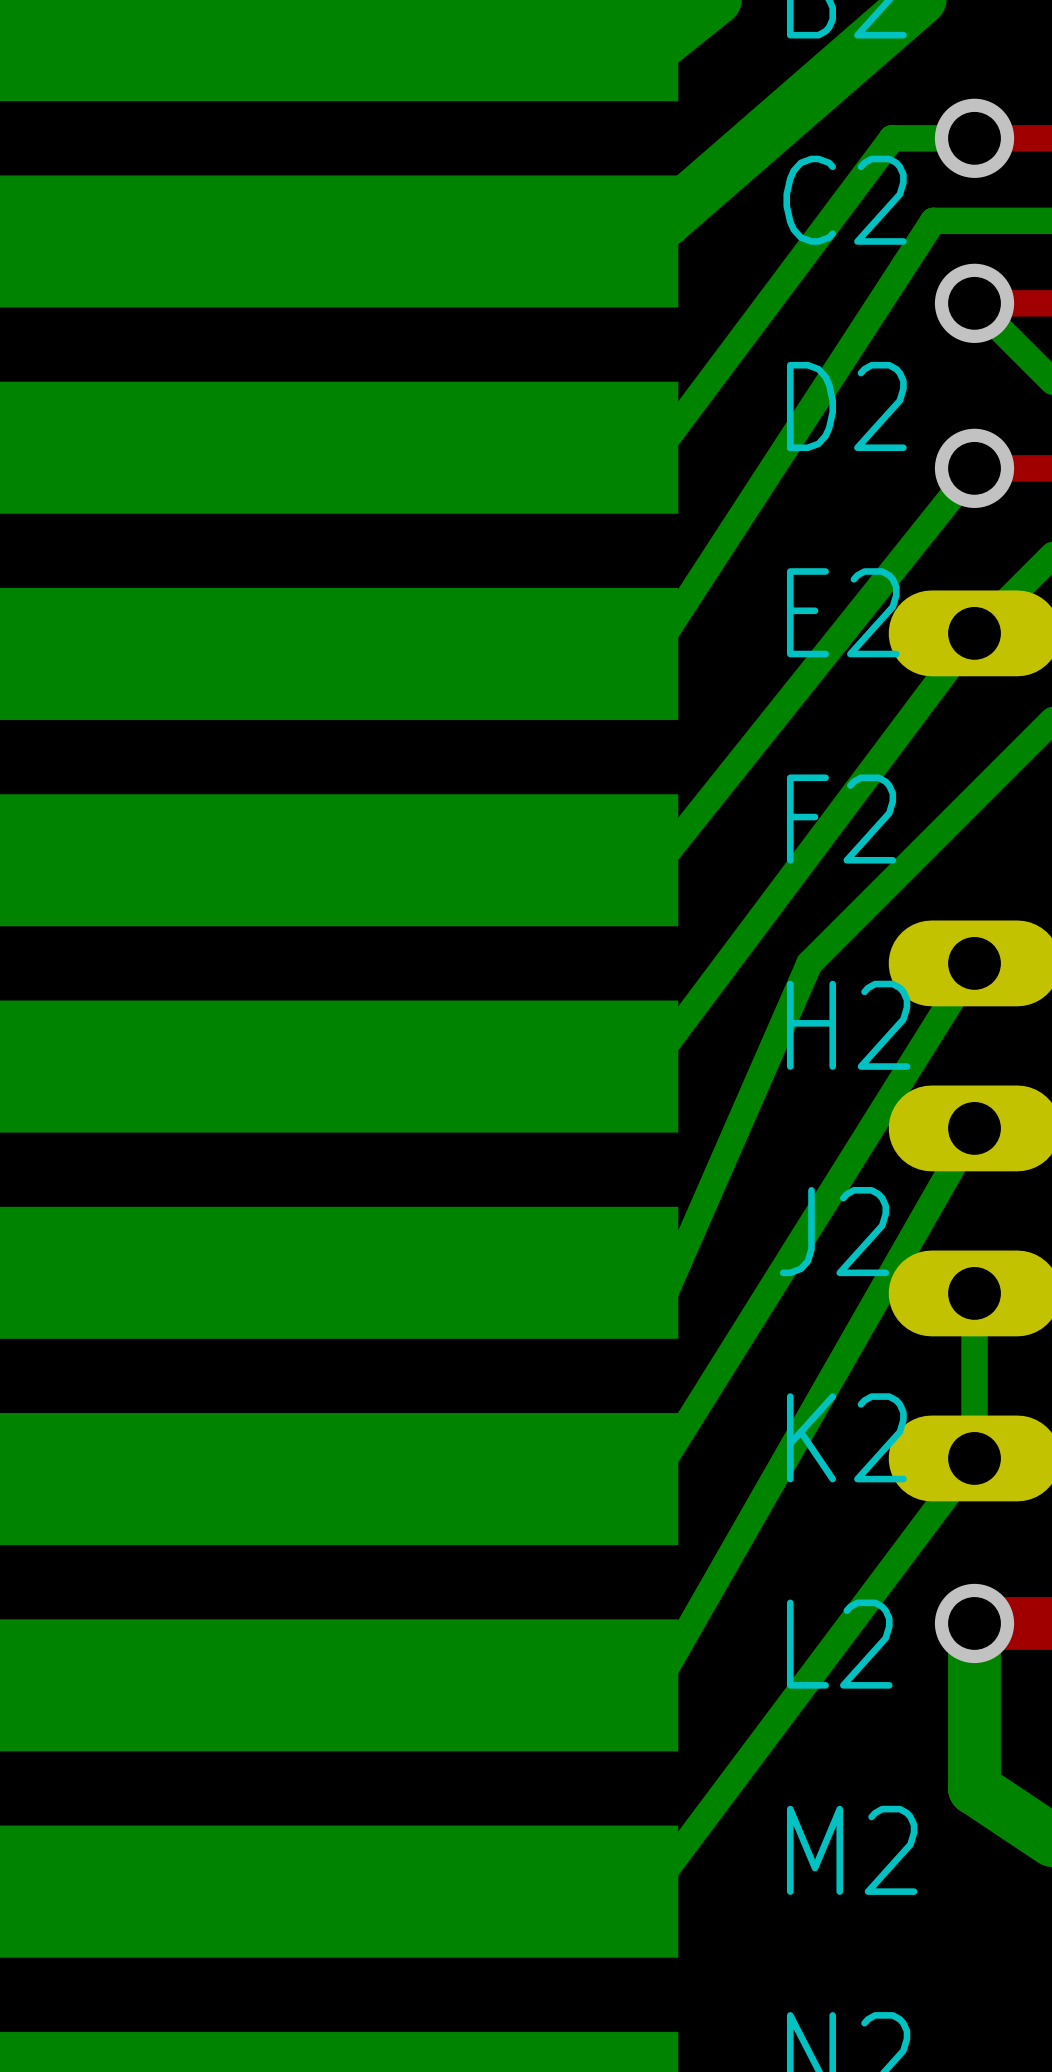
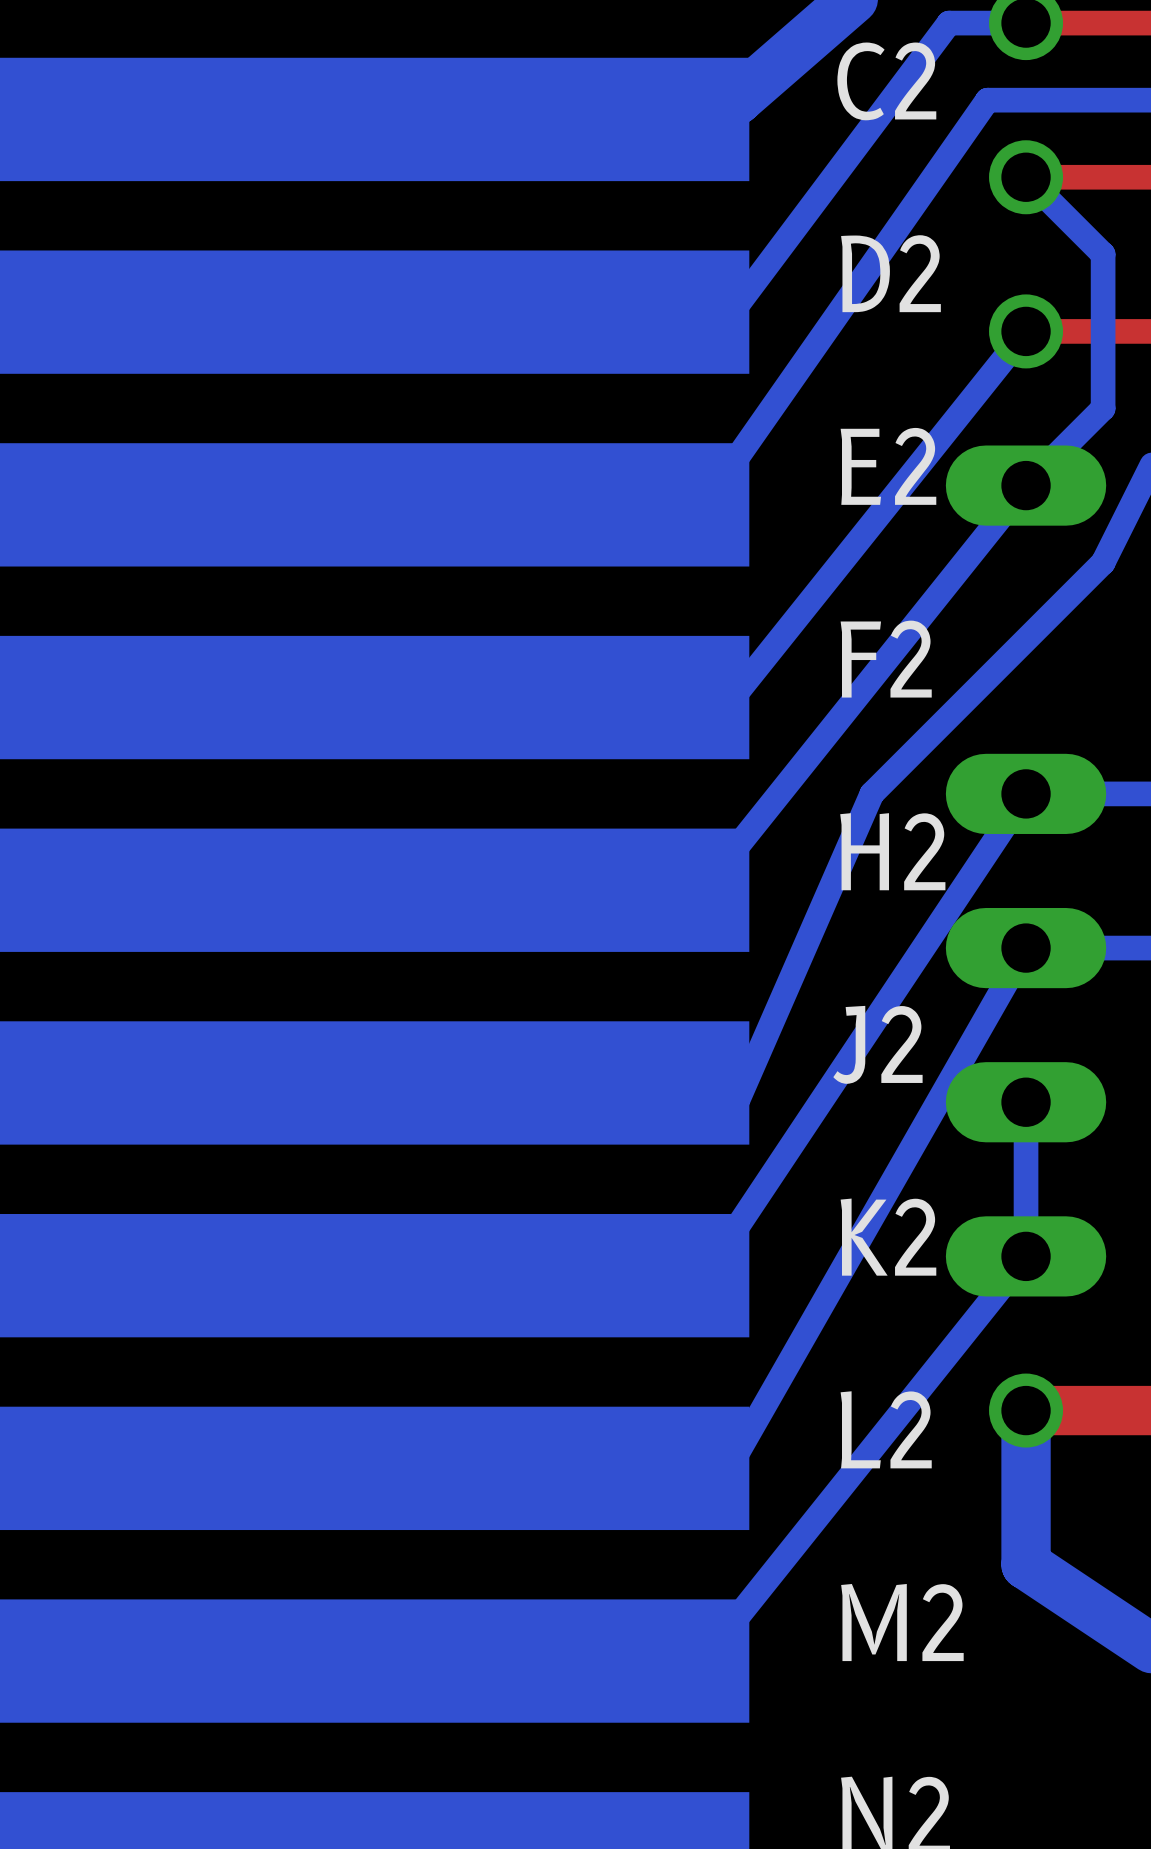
bottom track: (933, 220) (665, 633) (252, 654) -> (987, 100) (717, 485) (351, 504)
bottom track: (974, 633) (665, 1045) (252, 1066) -> (1026, 485) (717, 870) (351, 890)
bottom track: (974, 963) (665, 1458) (252, 1479) -> (1026, 793) (717, 1256) (351, 1275)
bottom track: (974, 1458) (665, 1870) (252, 1891) -> (1026, 1256) (717, 1641) (351, 1661)

